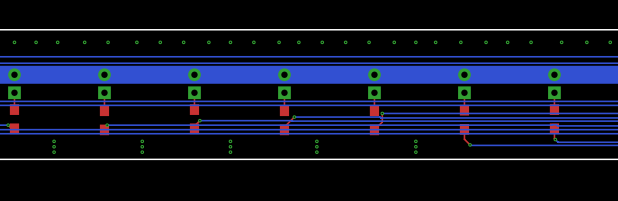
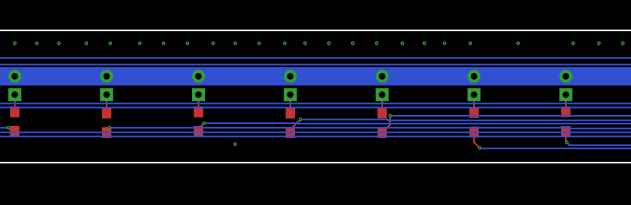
via: (486, 42) -> none
via: (531, 42) -> none
via: (54, 141) -> none
via: (142, 141) -> none
via: (316, 141) -> none
via: (415, 141) -> none
via: (54, 146) -> none
via: (142, 146) -> none
via: (230, 146) -> none
via: (316, 146) -> none
via: (415, 146) -> none
via: (54, 152) -> none
via: (142, 152) -> none
via: (230, 152) -> none
via: (316, 152) -> none
via: (415, 152) -> none

